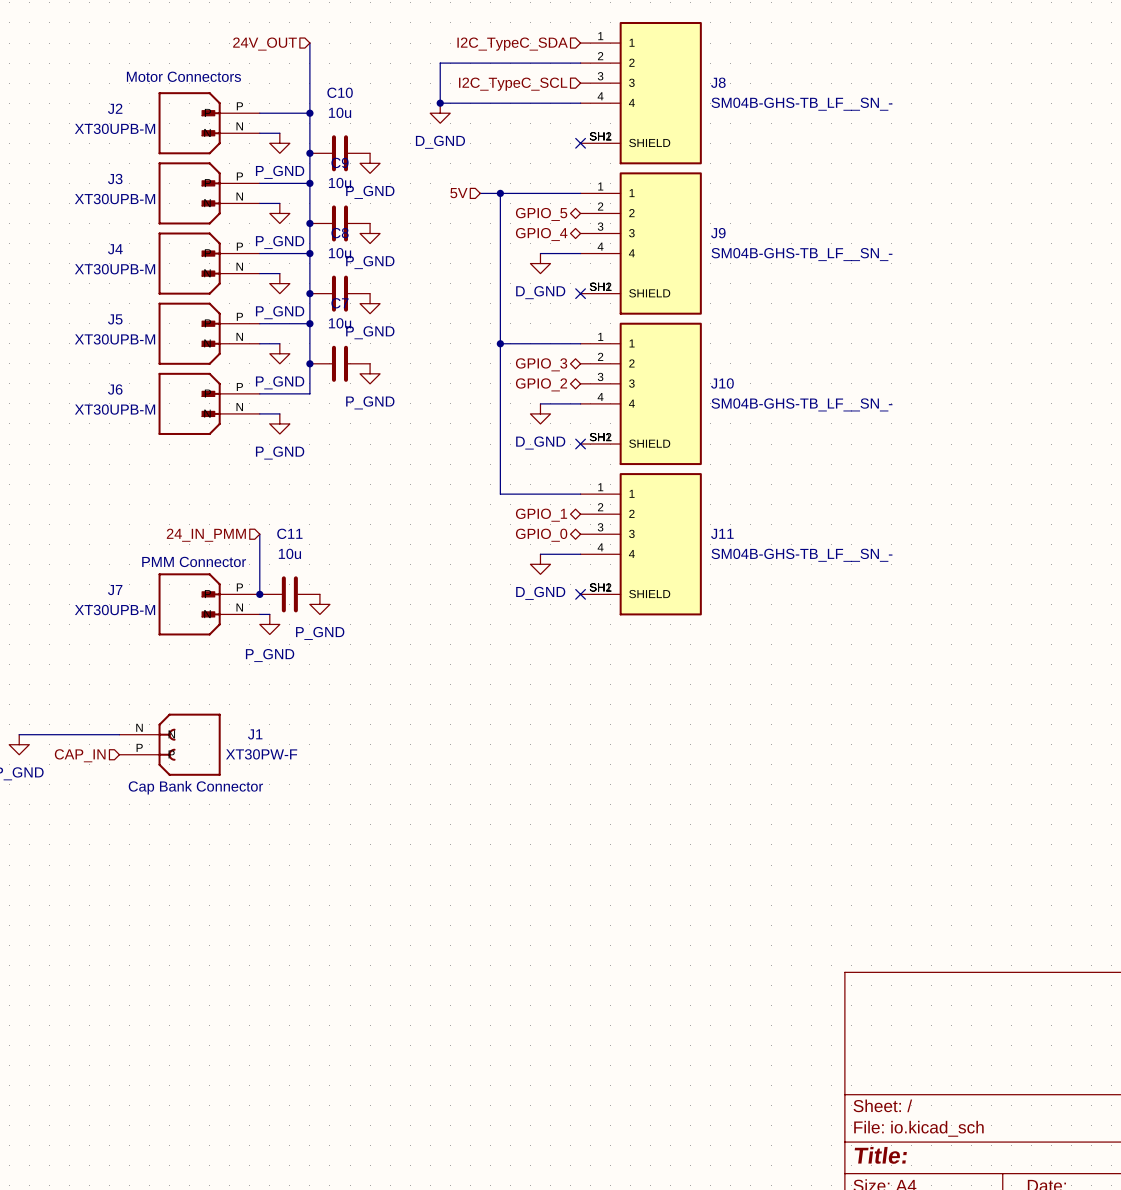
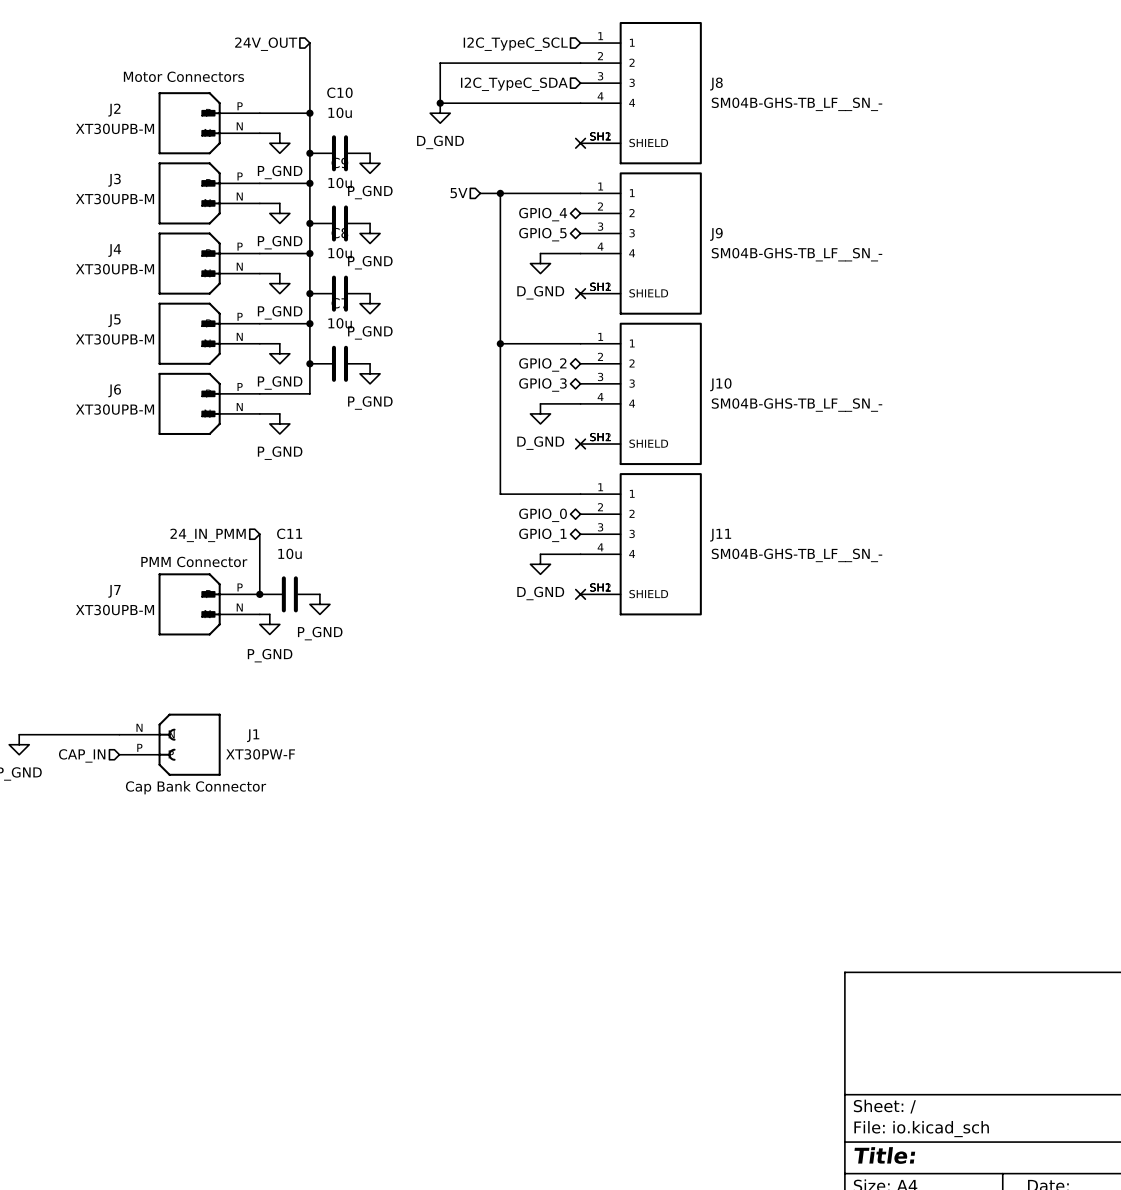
hierarchical label: I2C_TypeC_SDA (512, 44) -> I2C_TypeC_SCL (515, 44)
hierarchical label: I2C_TypeC_SCL (513, 84) -> I2C_TypeC_SDA (514, 84)
hierarchical label: GPIO_5 (541, 214) -> GPIO_4 (543, 214)
hierarchical label: GPIO_4 (541, 234) -> GPIO_5 (542, 234)
hierarchical label: GPIO_3 (541, 364) -> GPIO_2 (542, 364)
hierarchical label: GPIO_2 (541, 384) -> GPIO_3 (542, 385)
hierarchical label: GPIO_1 (541, 515) -> GPIO_0 (543, 515)
hierarchical label: GPIO_0 (541, 535) -> GPIO_1 (542, 535)

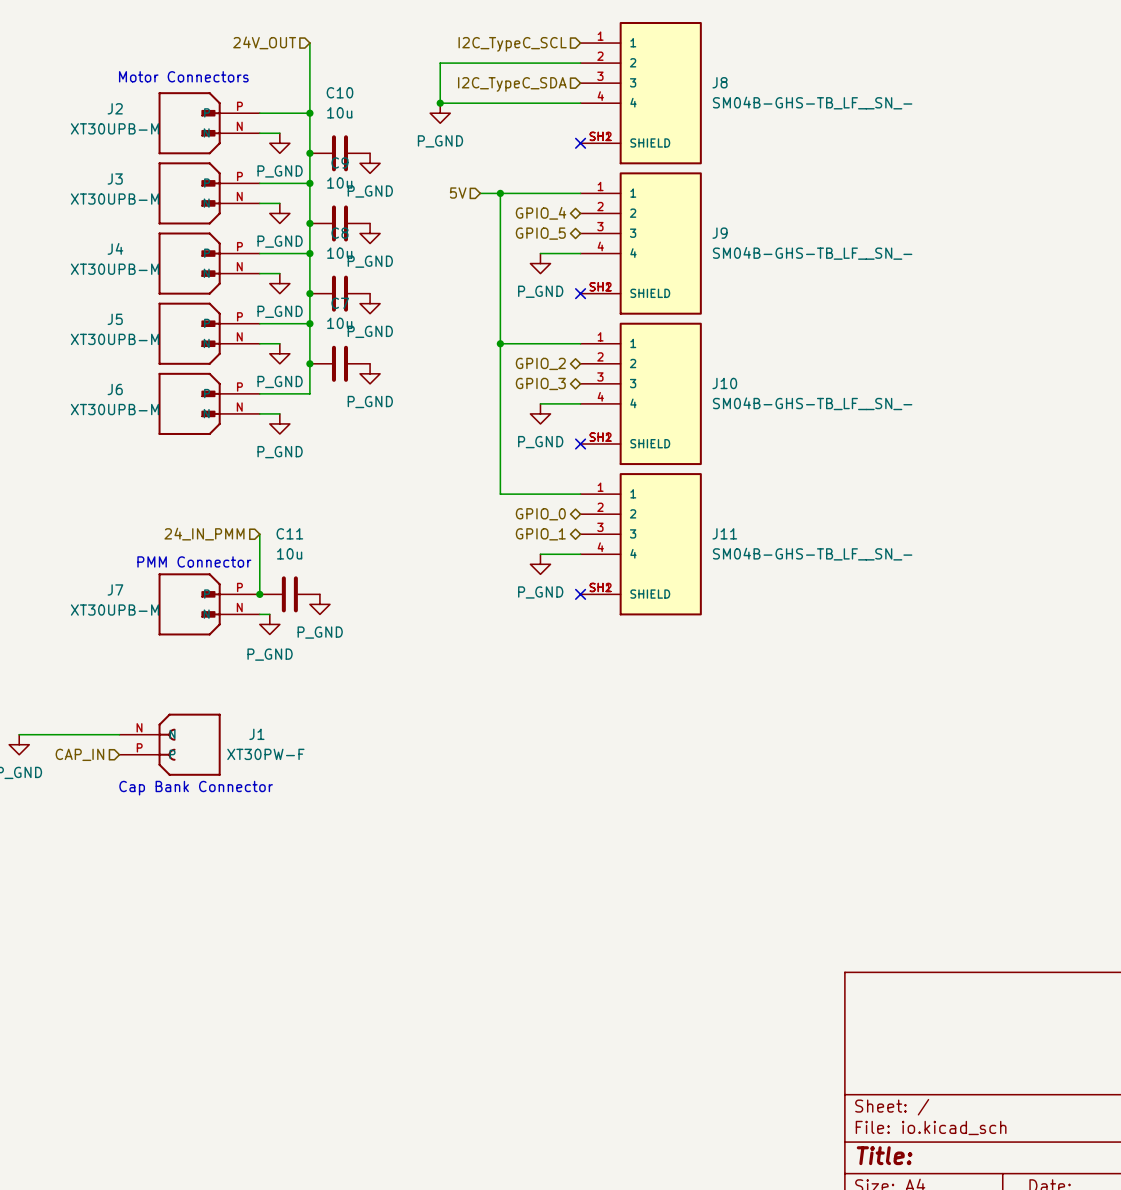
power symbol: D_GND (440, 113) -> P_GND (440, 113)
power symbol: D_GND (540, 263) -> P_GND (540, 263)
power symbol: D_GND (540, 413) -> P_GND (540, 413)
power symbol: D_GND (540, 564) -> P_GND (540, 564)

